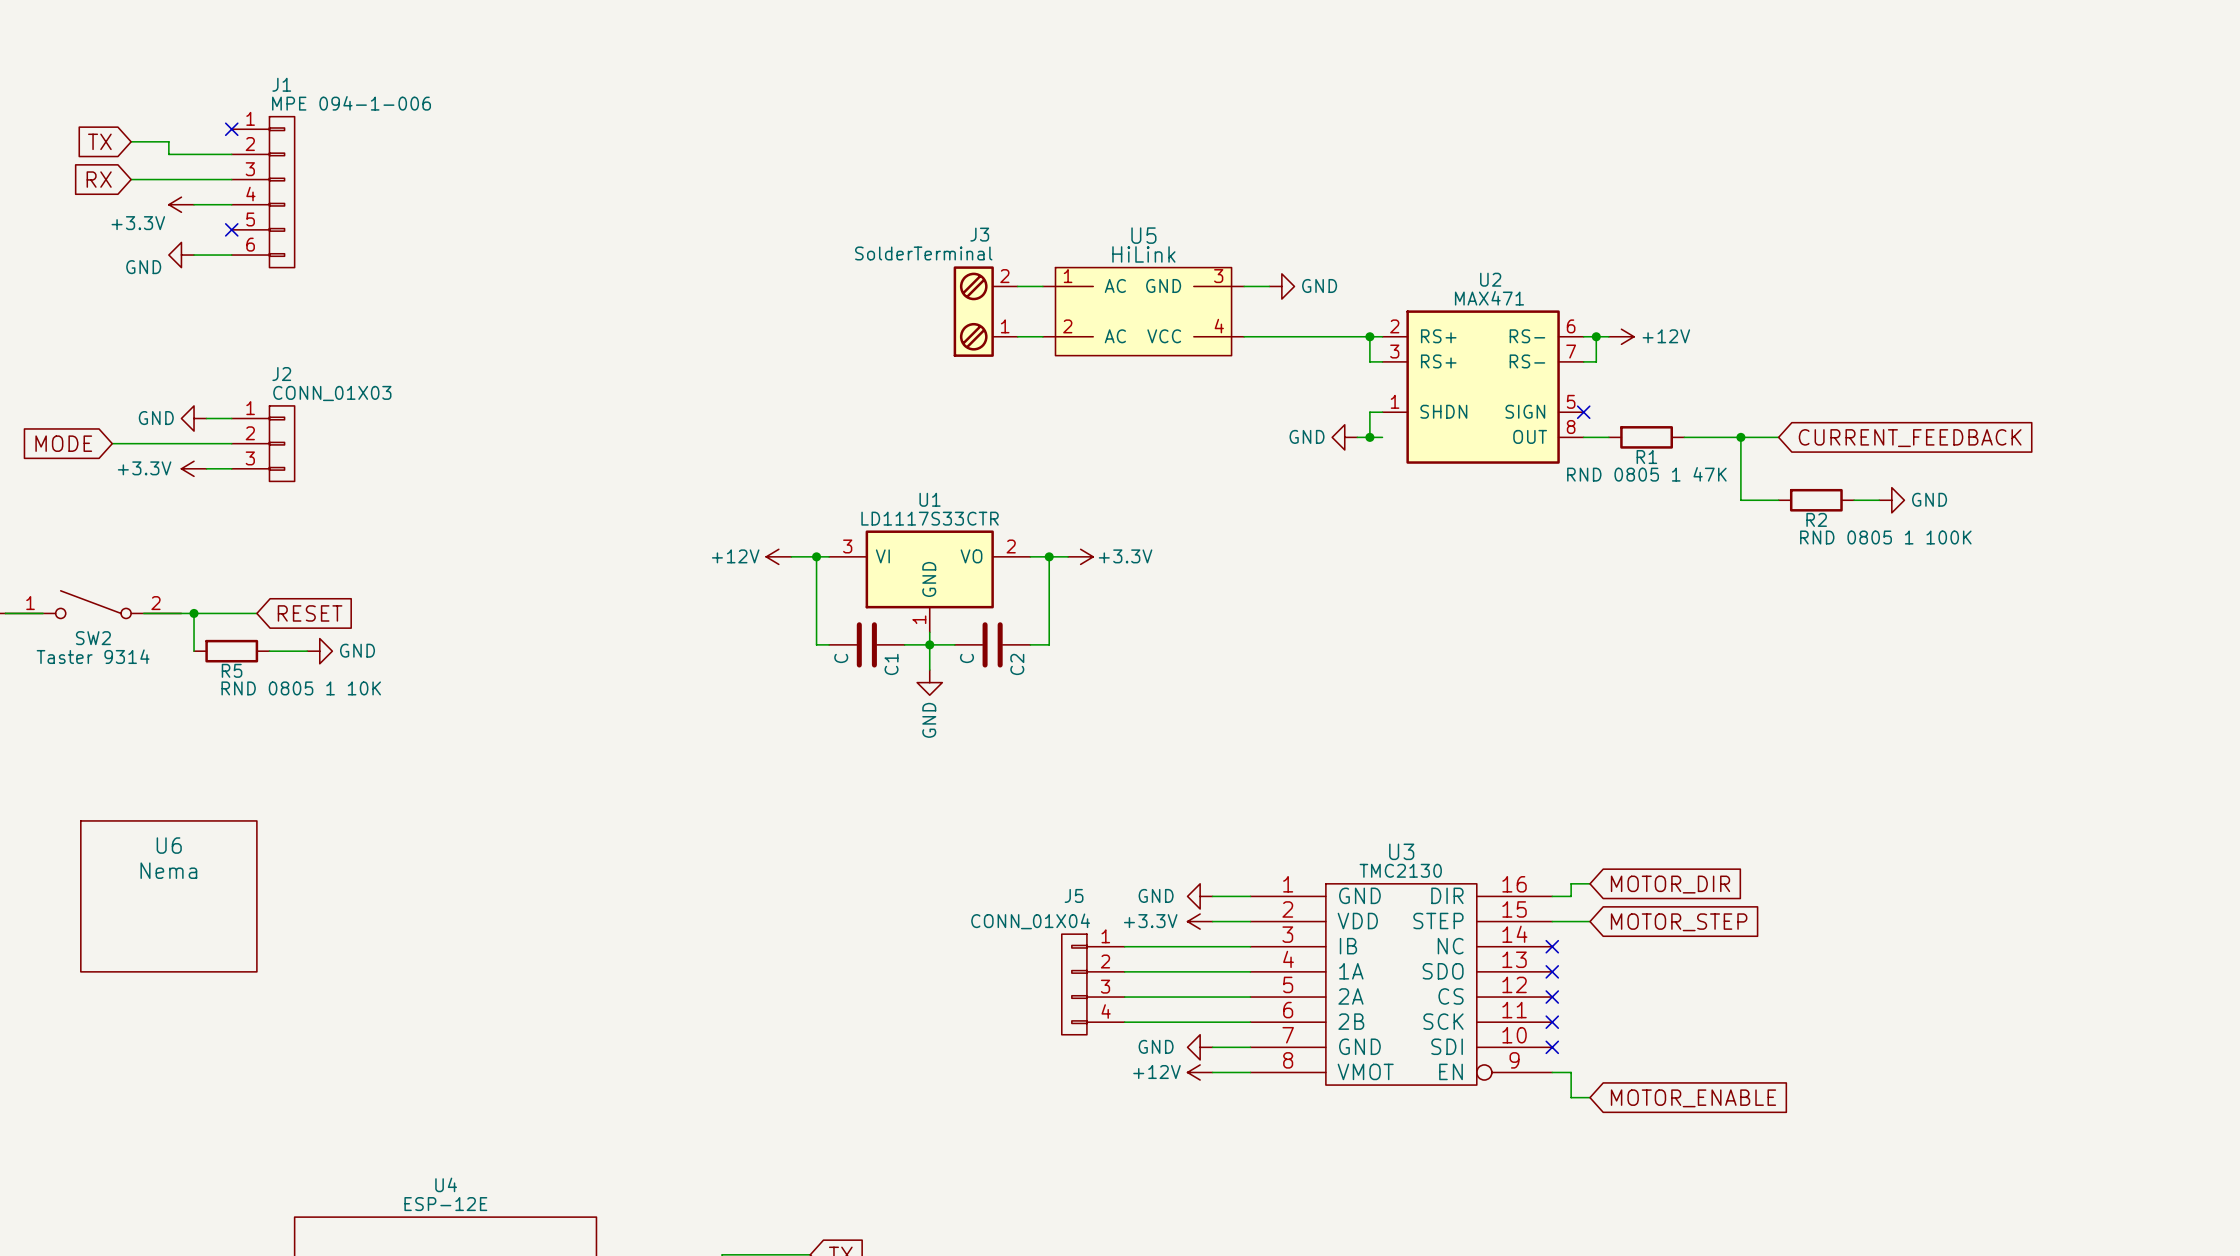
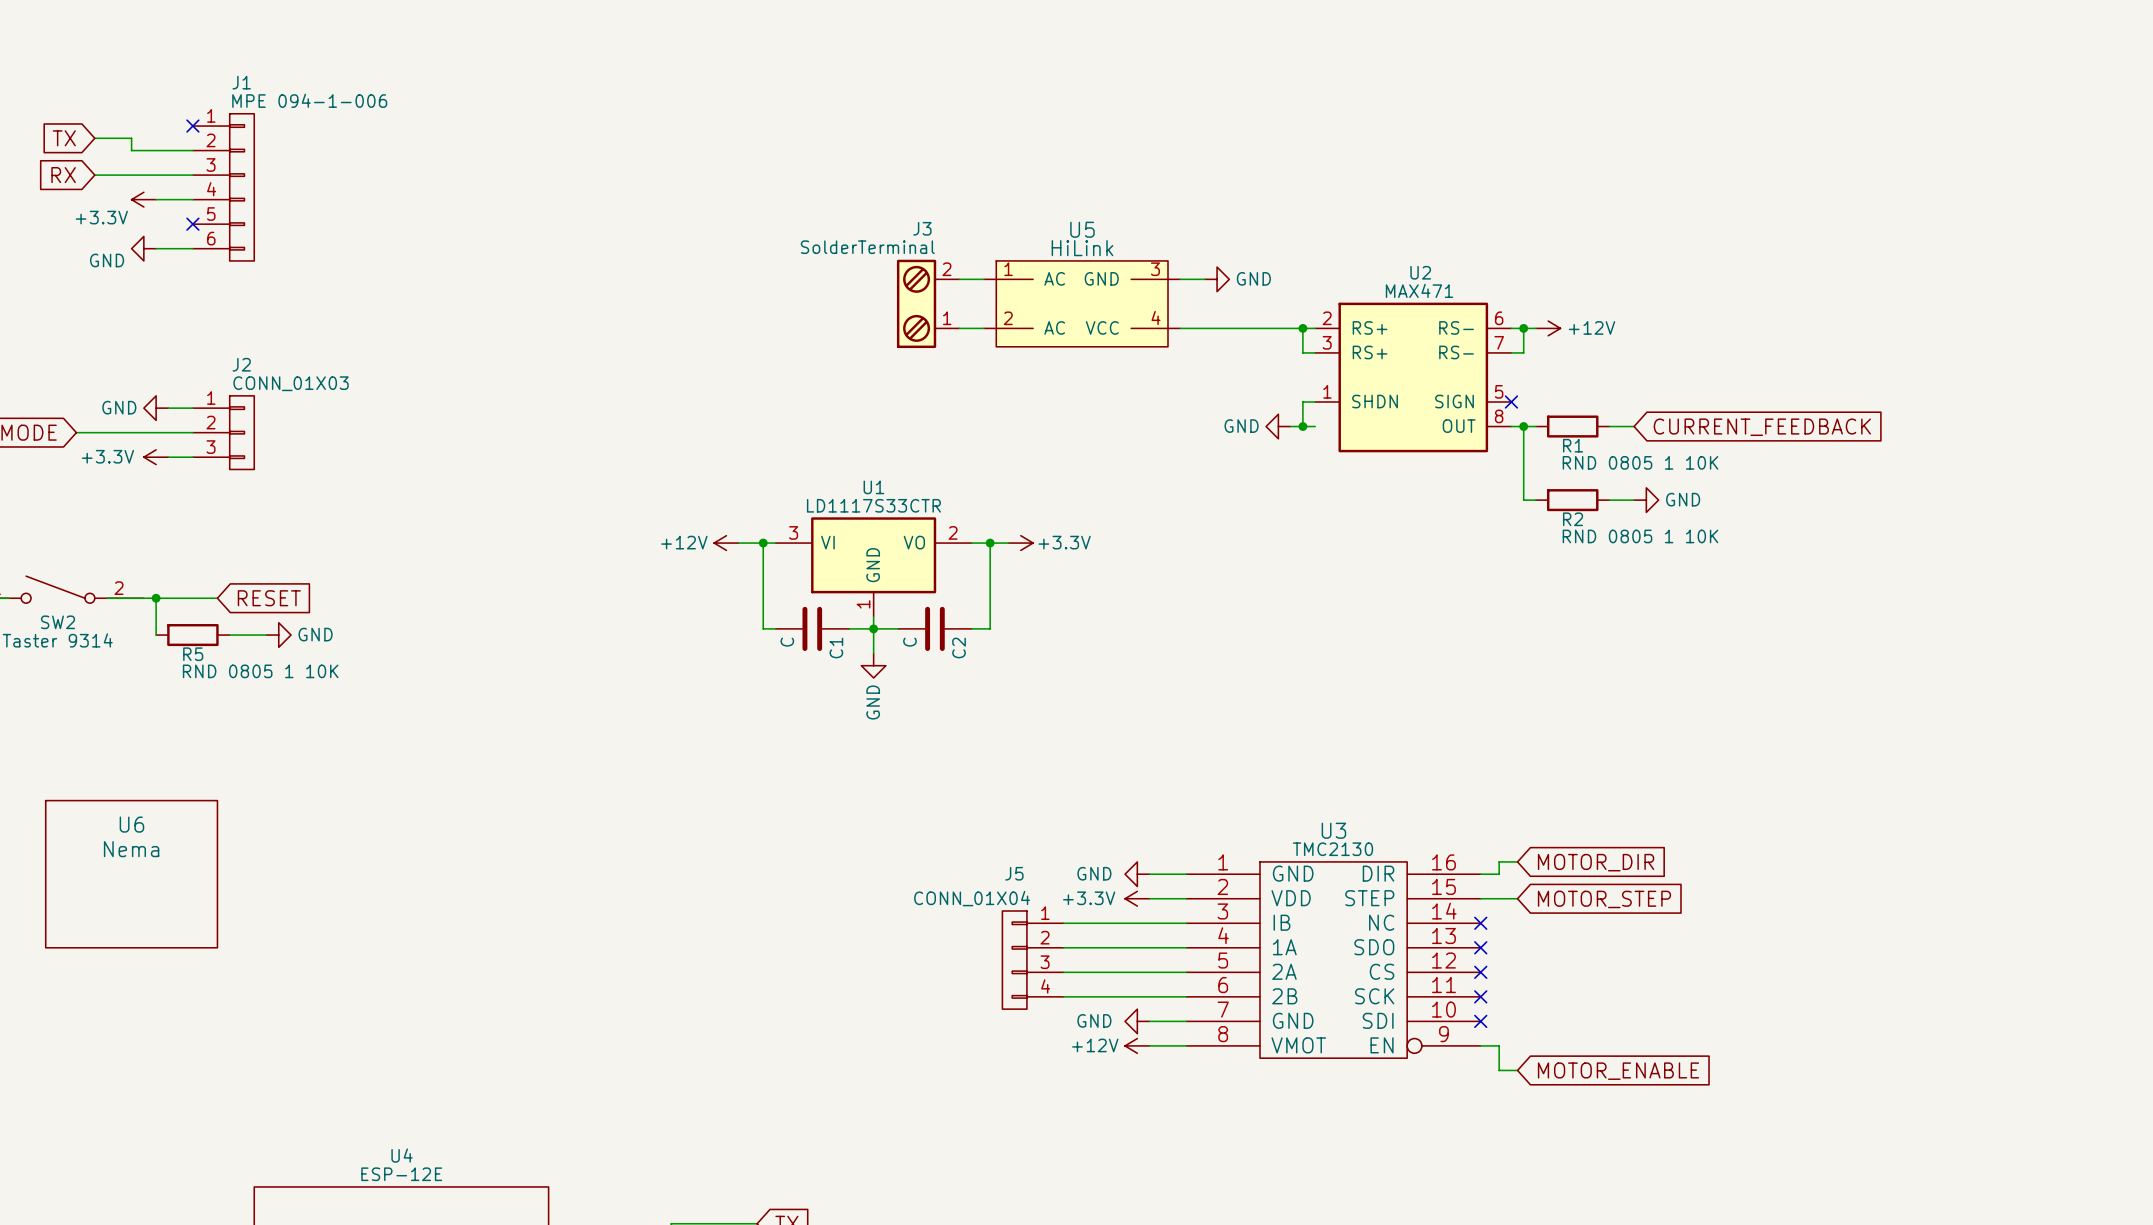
wire: none -> (1523, 426) (1523, 500) (1535, 500)
junction: none -> (1523, 426)
wire: (1709, 437) (1778, 437) -> none
wire: (1740, 437) (1740, 500) (1778, 500) -> none
junction: (1740, 437) -> none
global label position: CURRENT_FEEDBACK (1910, 438) -> CURRENT_FEEDBACK (1762, 427)
R1 value: RND 0805 1 47K (1646, 474) -> RND 0805 1 10K (1640, 462)
R2 position: (1816, 500) -> (1572, 500)
wire: (1854, 500) (1879, 500) -> (1609, 500) (1634, 500)
power symbol position: GND (1891, 500) -> GND (1646, 500)
R2 value: RND 0805 1 100K (1885, 537) -> RND 0805 1 10K (1640, 536)

